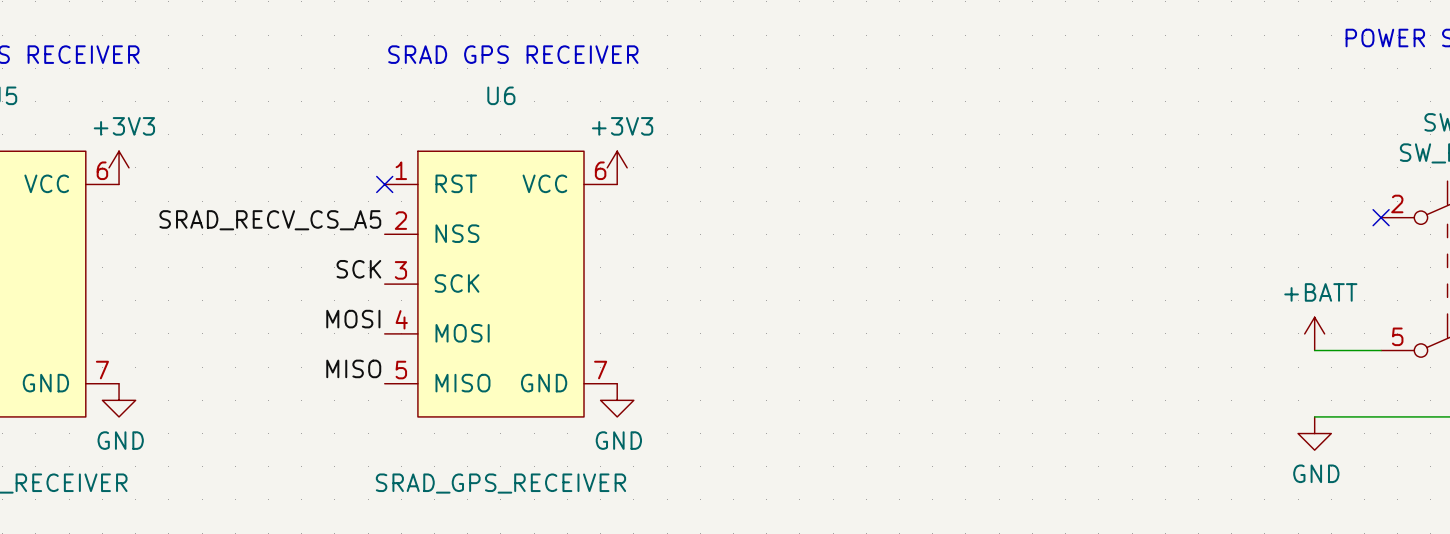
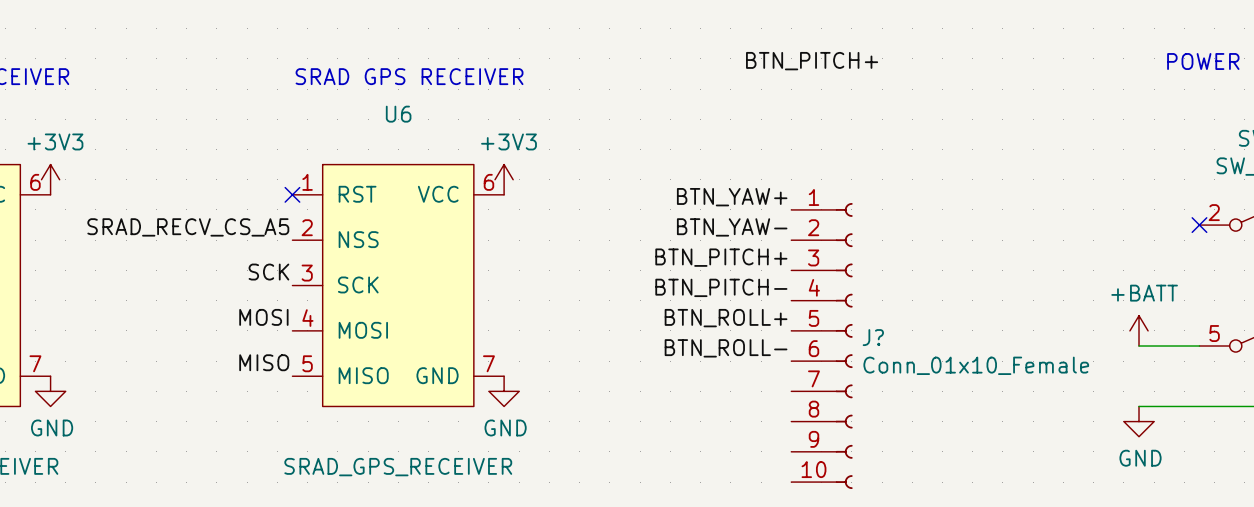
label: none -> BTN_PITCH+ (812, 61)
label: none -> BTN_YAW+ (732, 197)
label: none -> BTN_YAW- (732, 227)
label: none -> BTN_PITCH+ (721, 257)
label: none -> BTN_PITCH- (721, 287)
label: none -> BTN_ROLL+ (726, 318)
J?: none -> Conn_01x10_Female (821, 346)
label: none -> BTN_ROLL- (726, 348)

